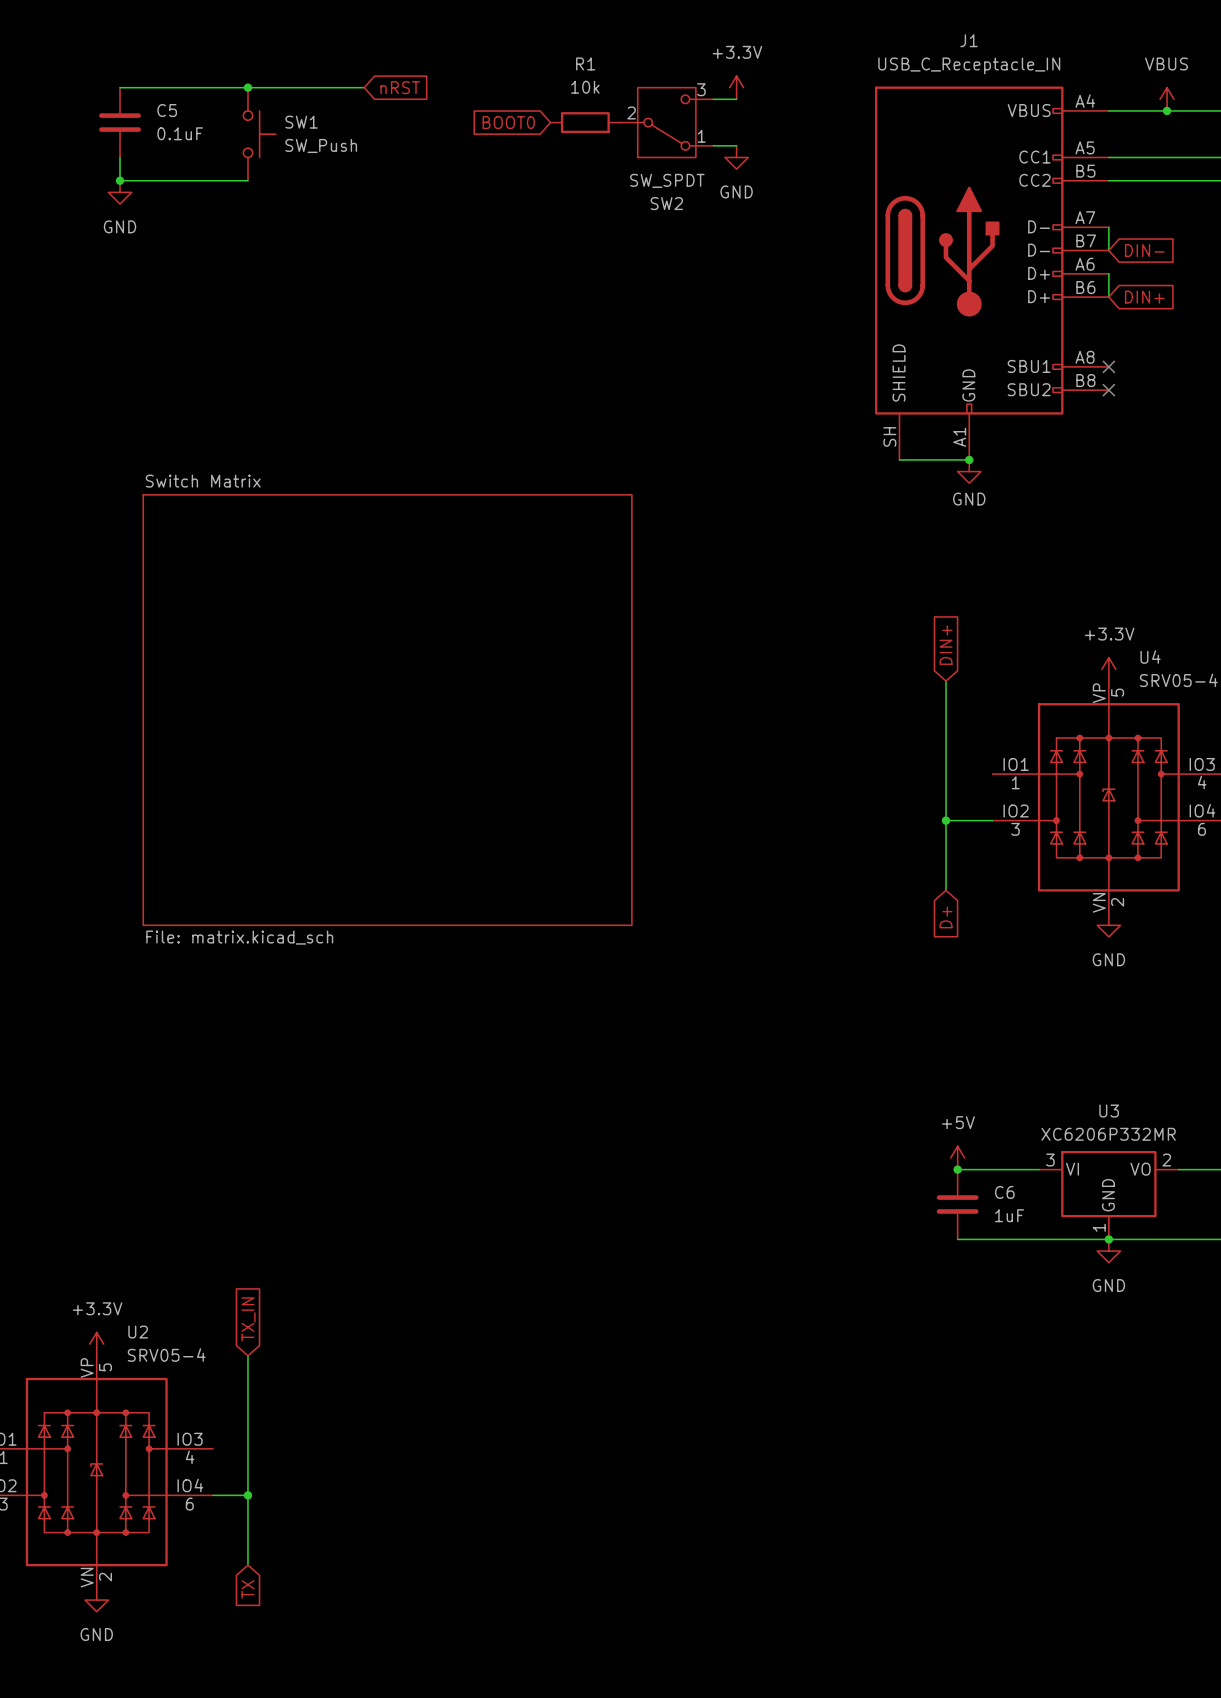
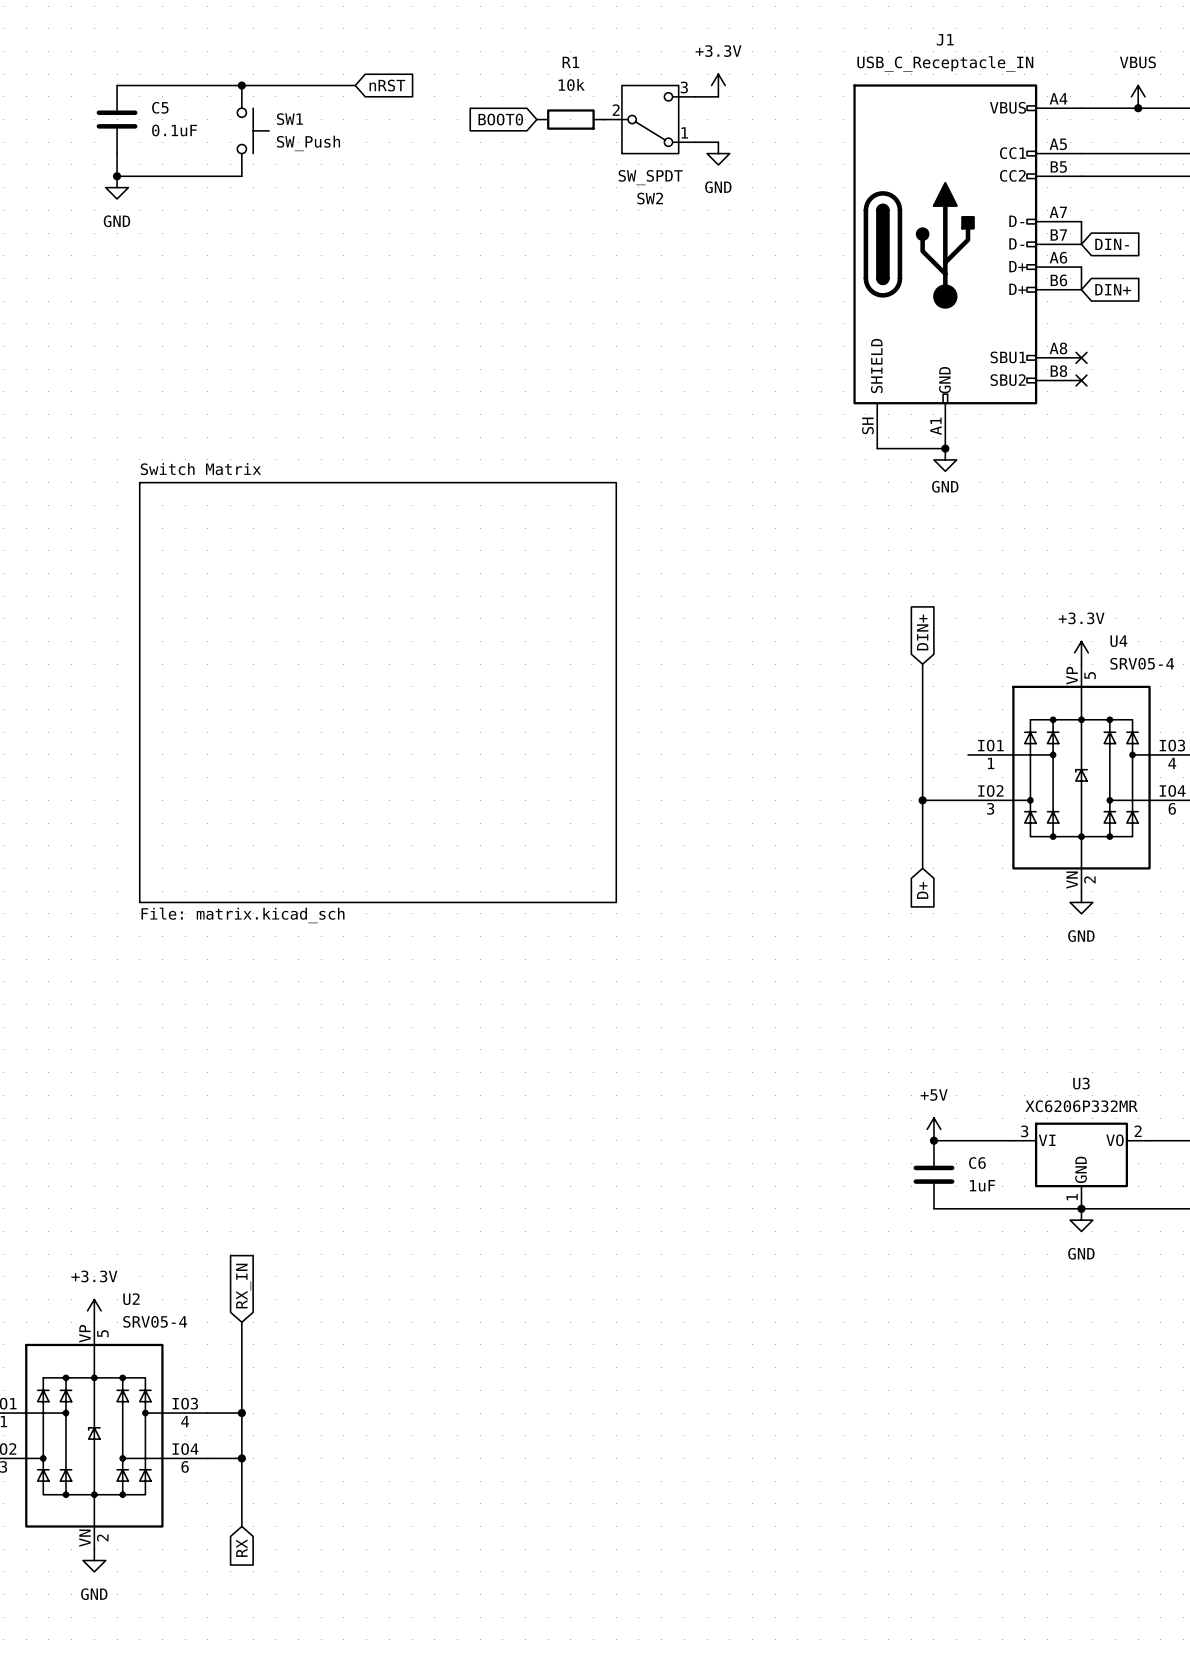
global label: TX_IN (248, 1319) -> RX_IN (243, 1286)
wire: none -> (207, 1413) (241, 1413)
junction: none -> (241, 1413)
global label: TX (247, 1589) -> RX (241, 1548)

